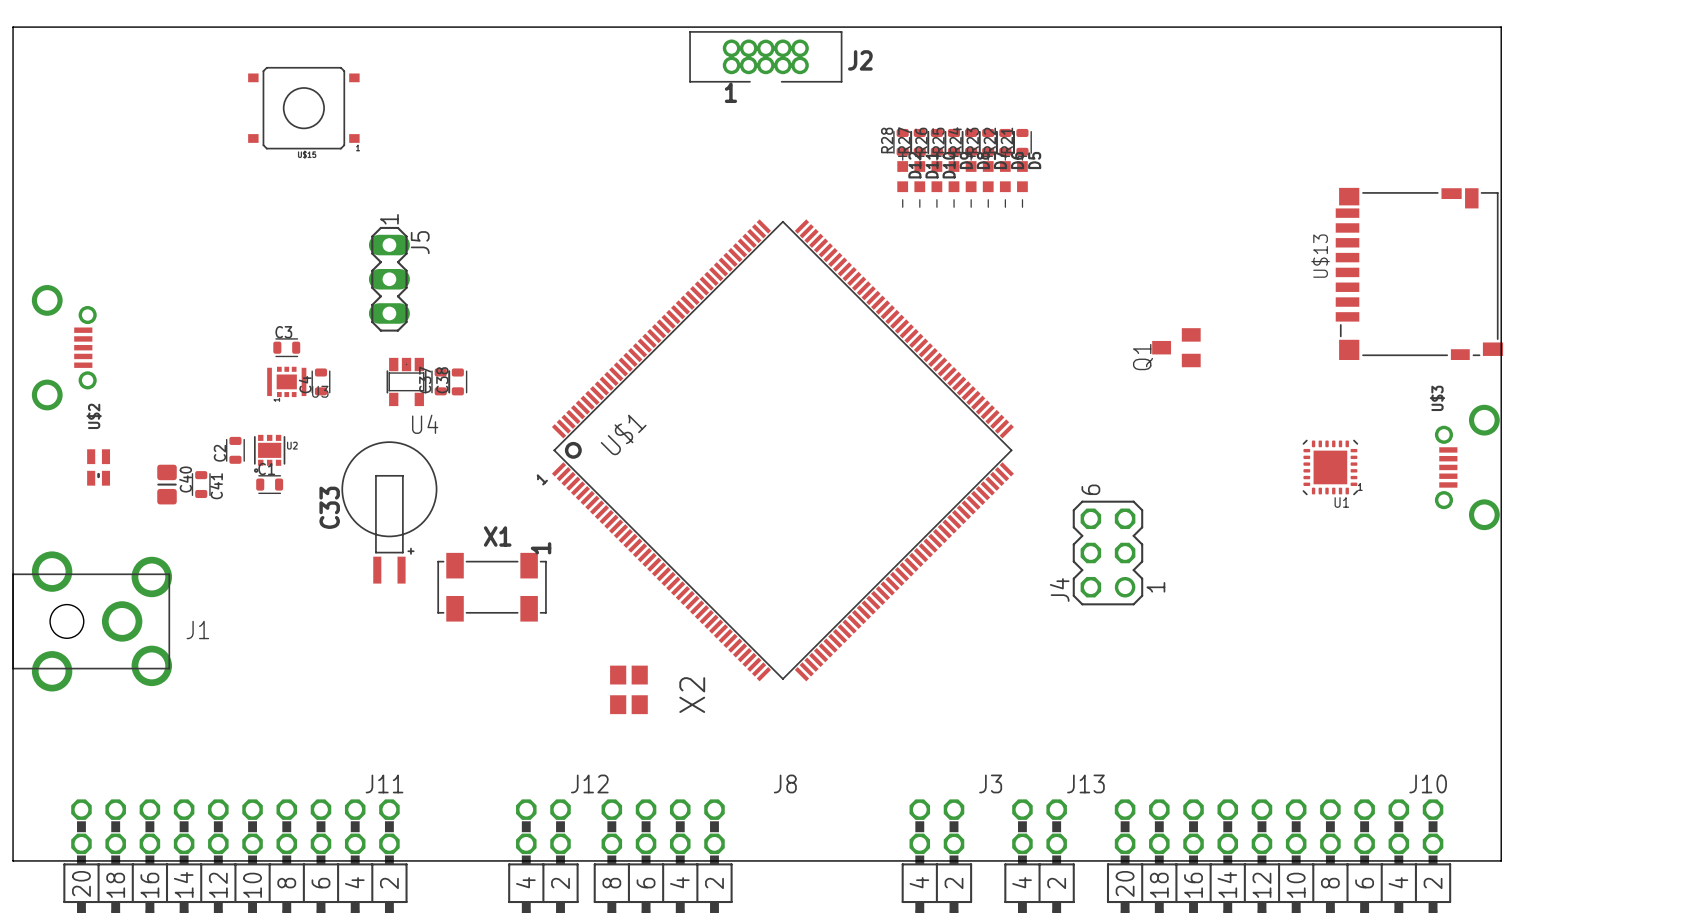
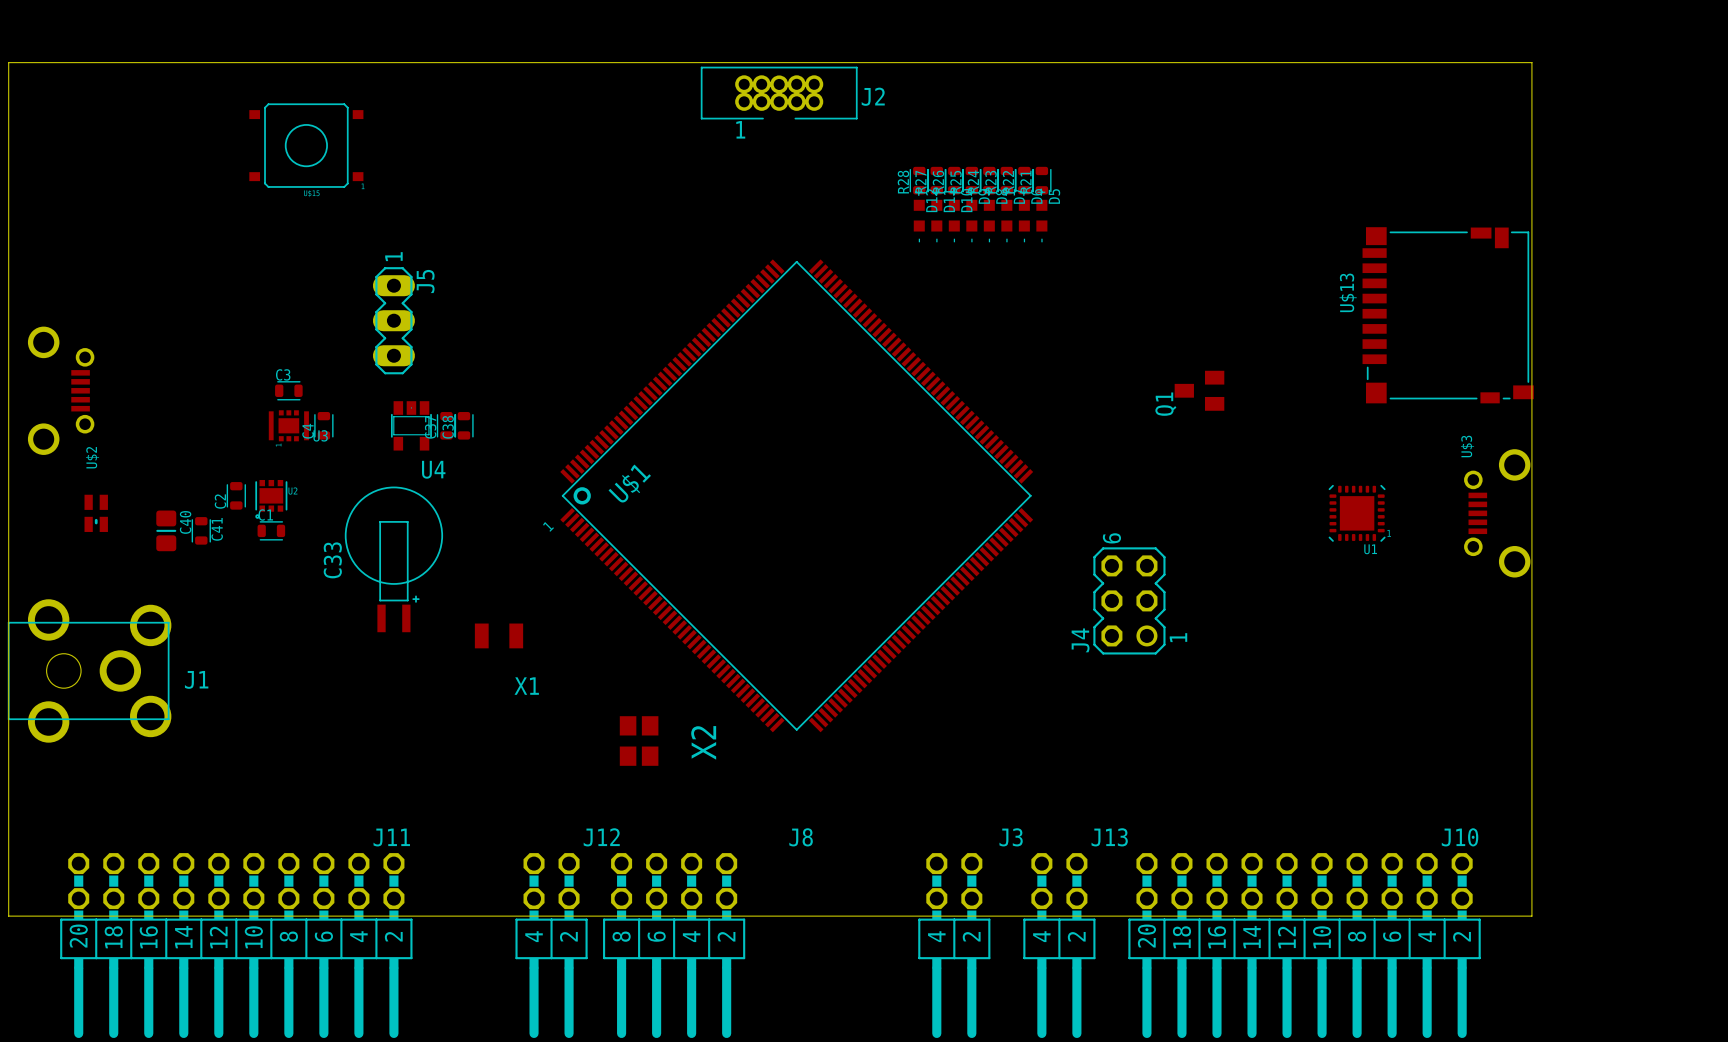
X1 name position: X1 (497, 536) -> X1 (526, 686)
X1 footprint: [437, 552, 547, 622] -> [474, 623, 524, 649]

